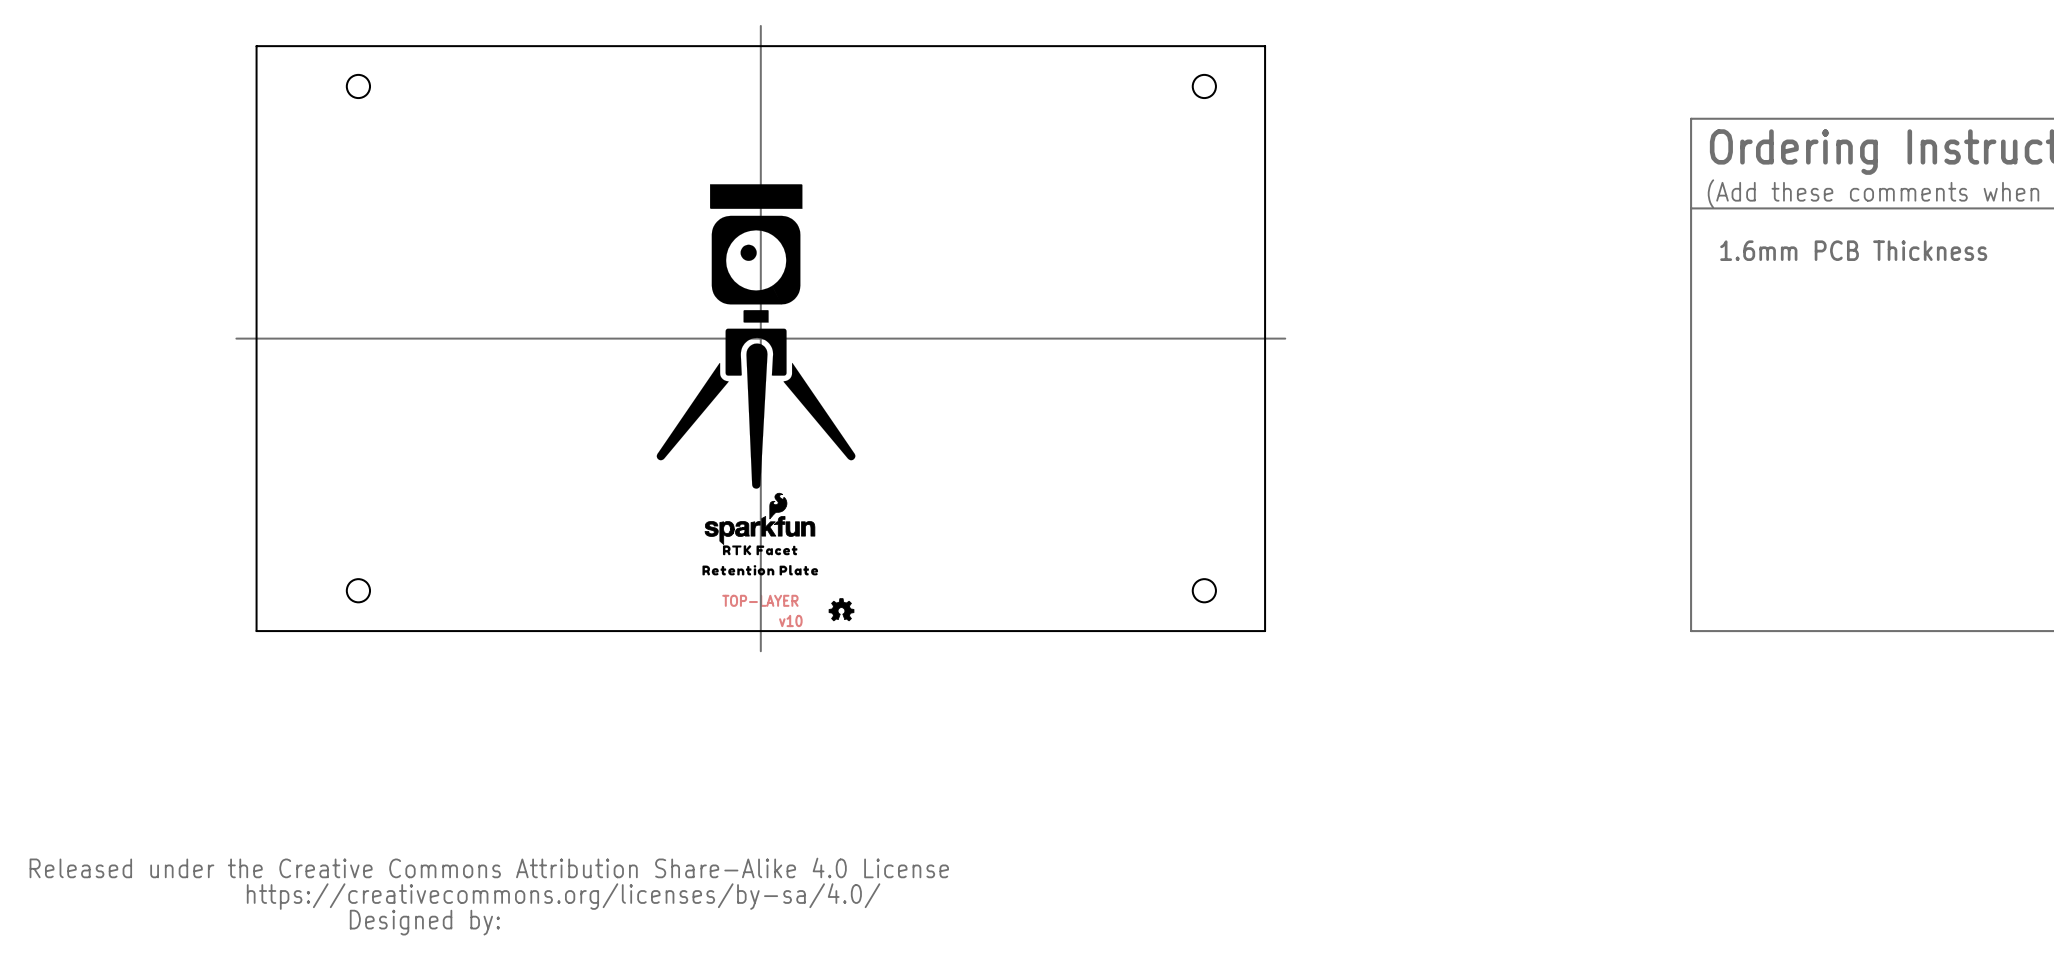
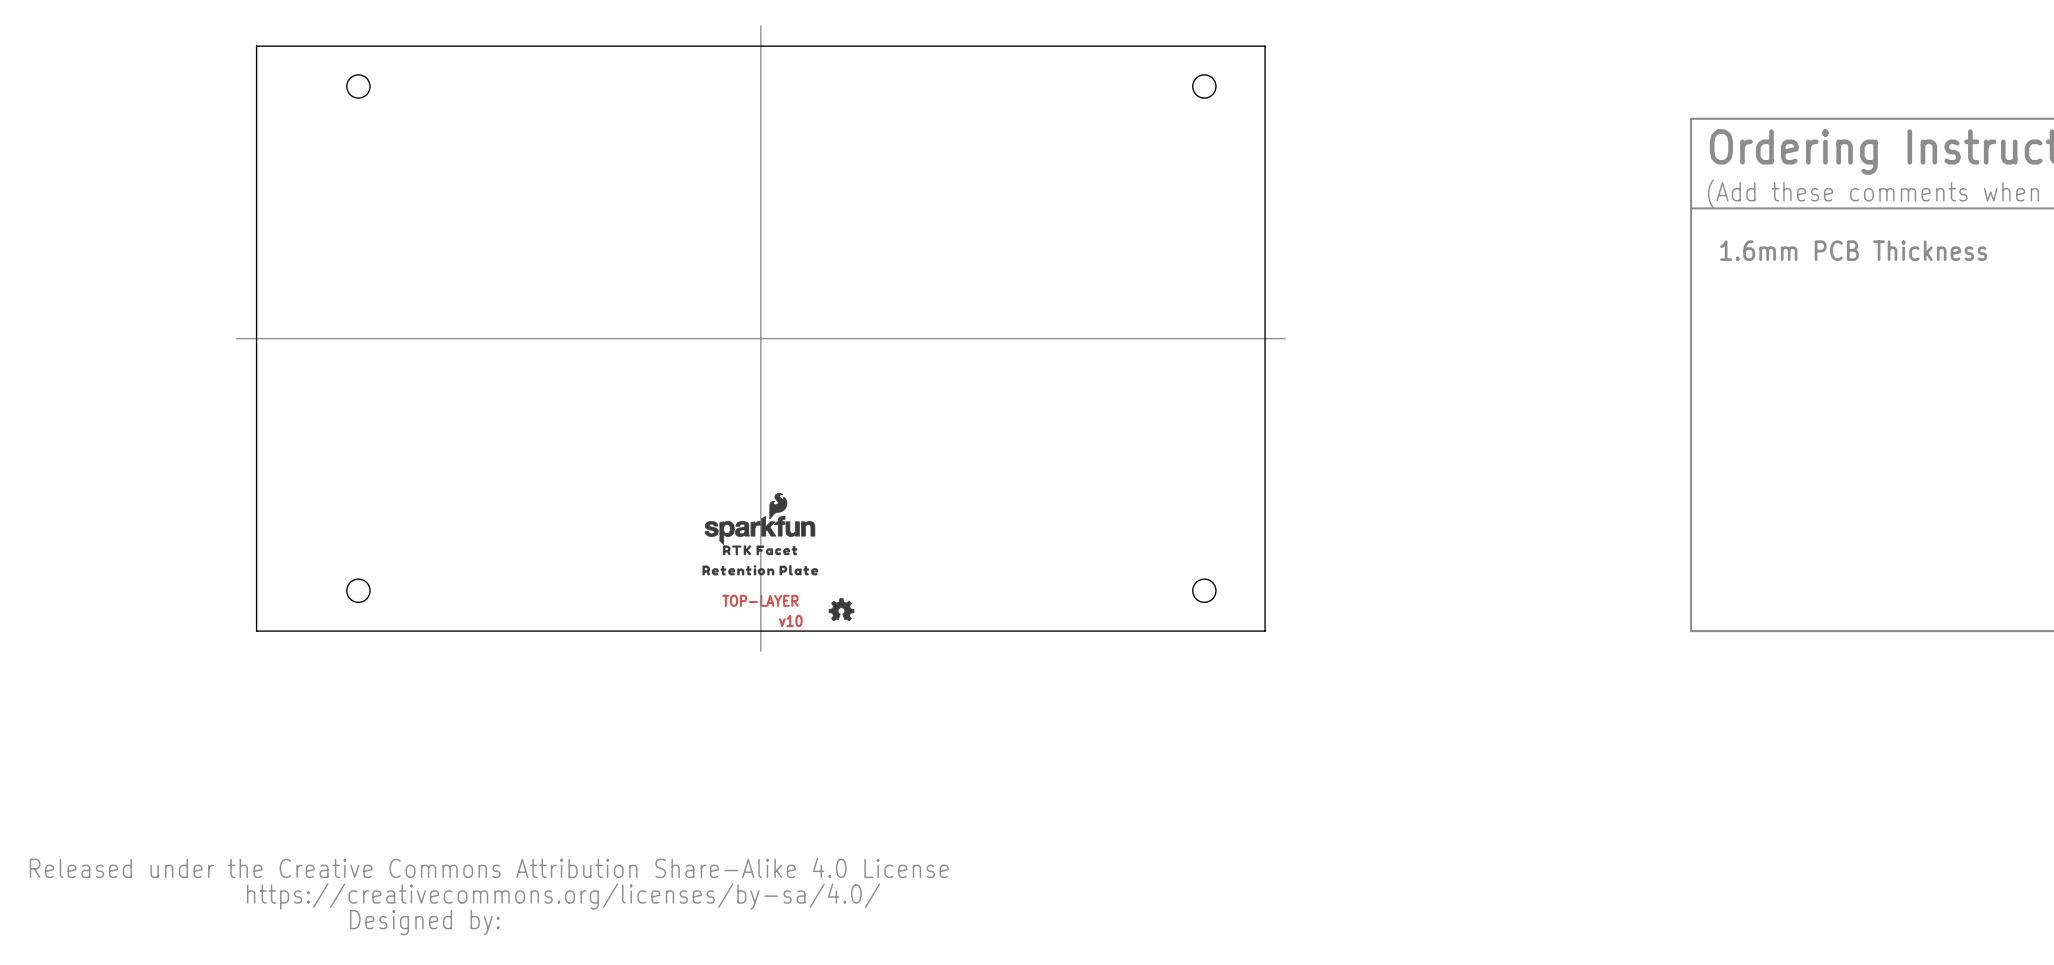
drawing: [656, 184, 856, 489] -> none

